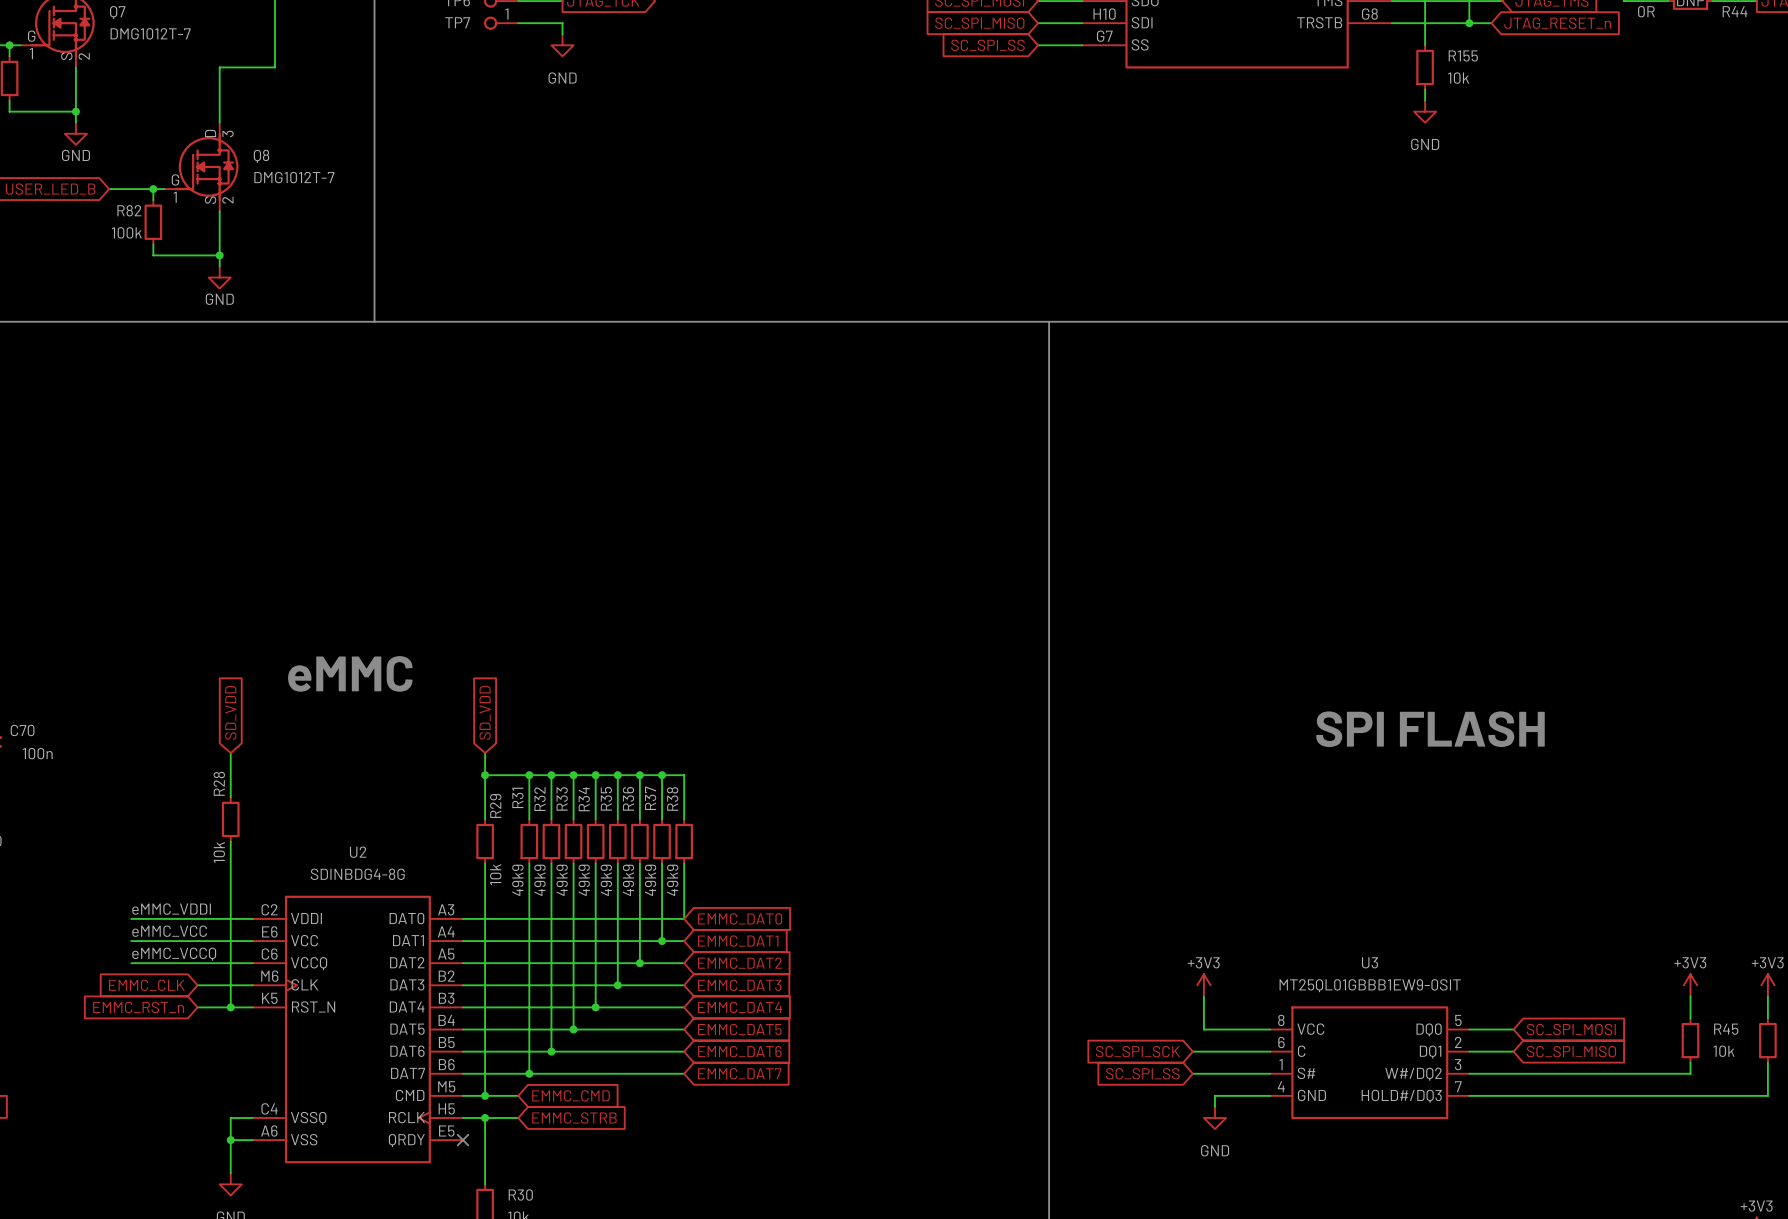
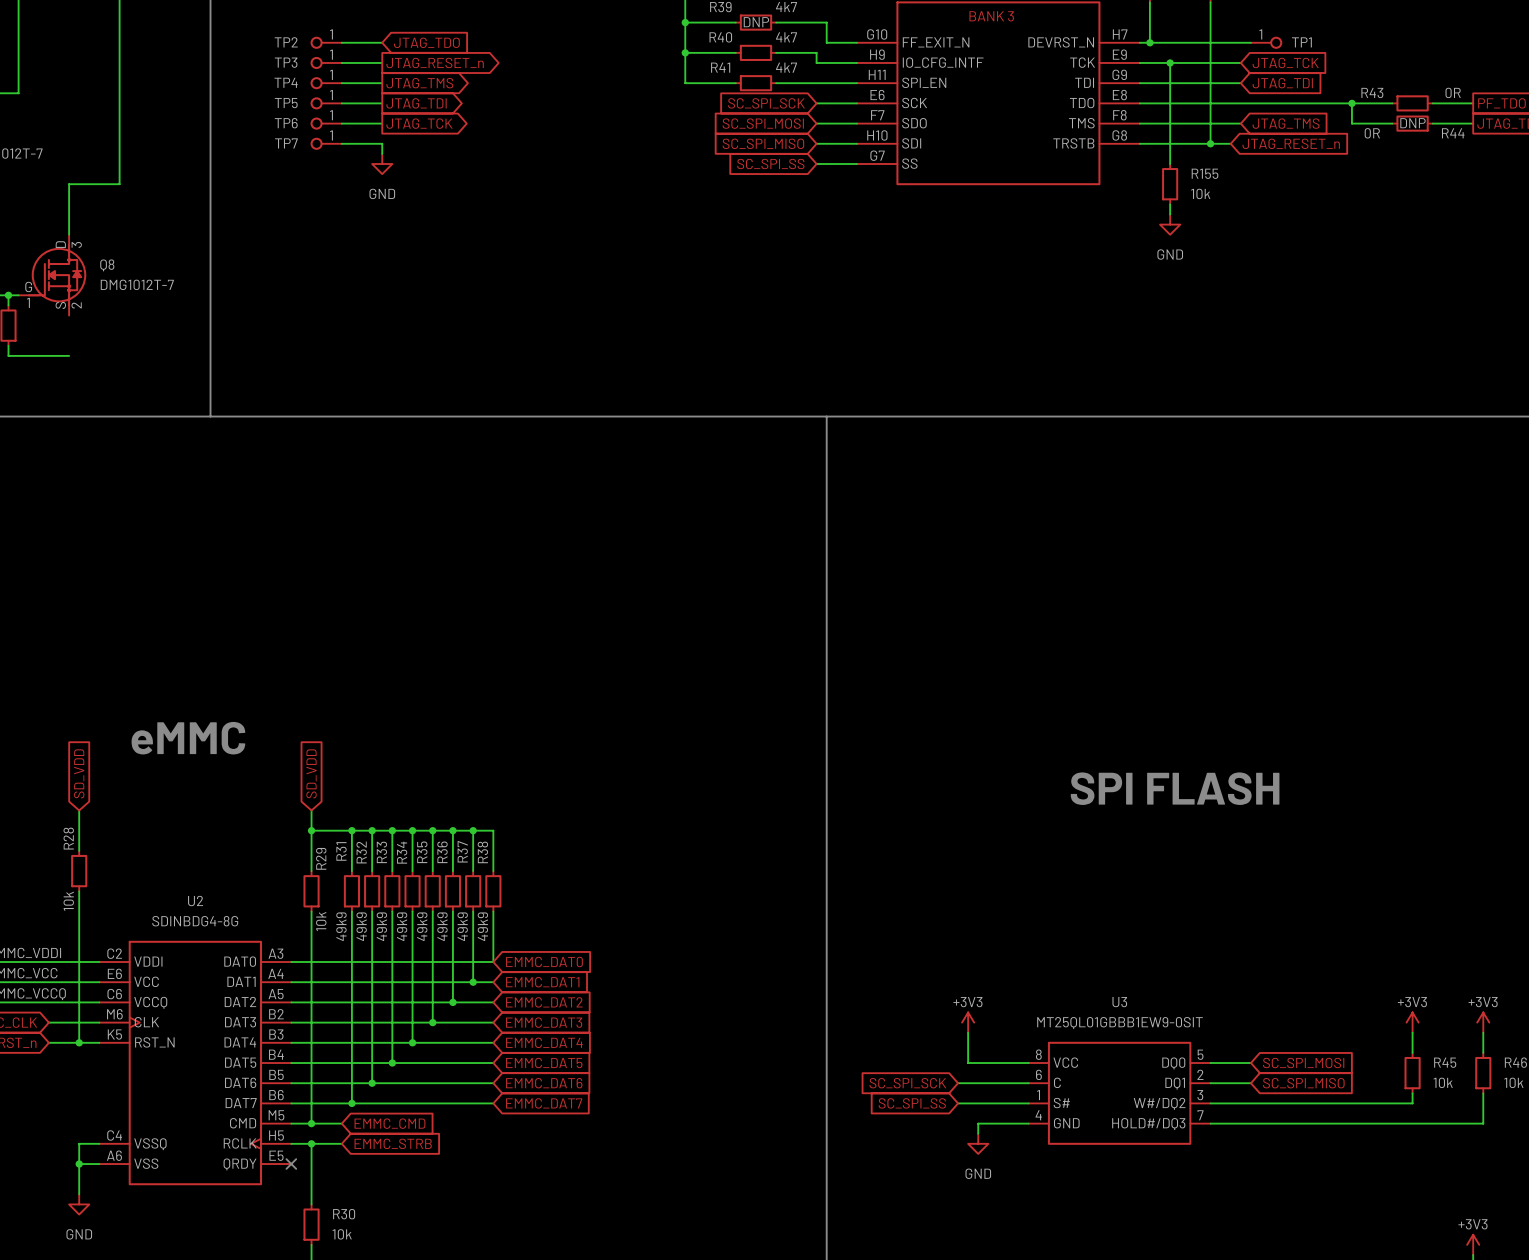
wire: (219, 211) (219, 266) -> none
junction: (219, 255) -> none
power symbol: GND (219, 277) -> none

